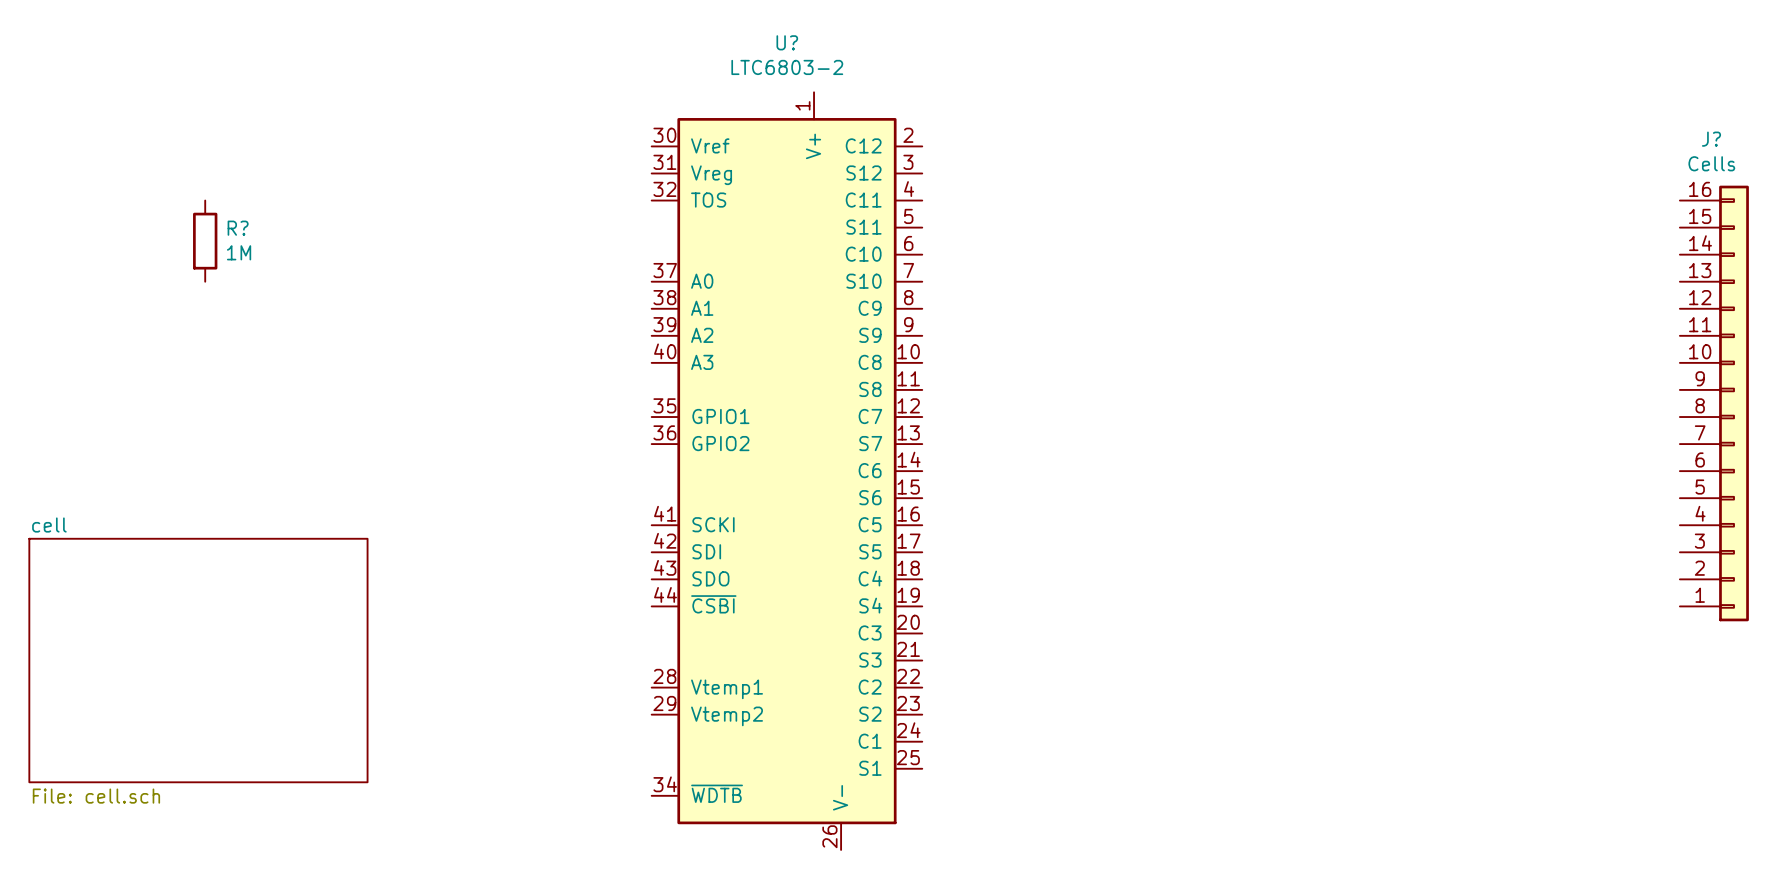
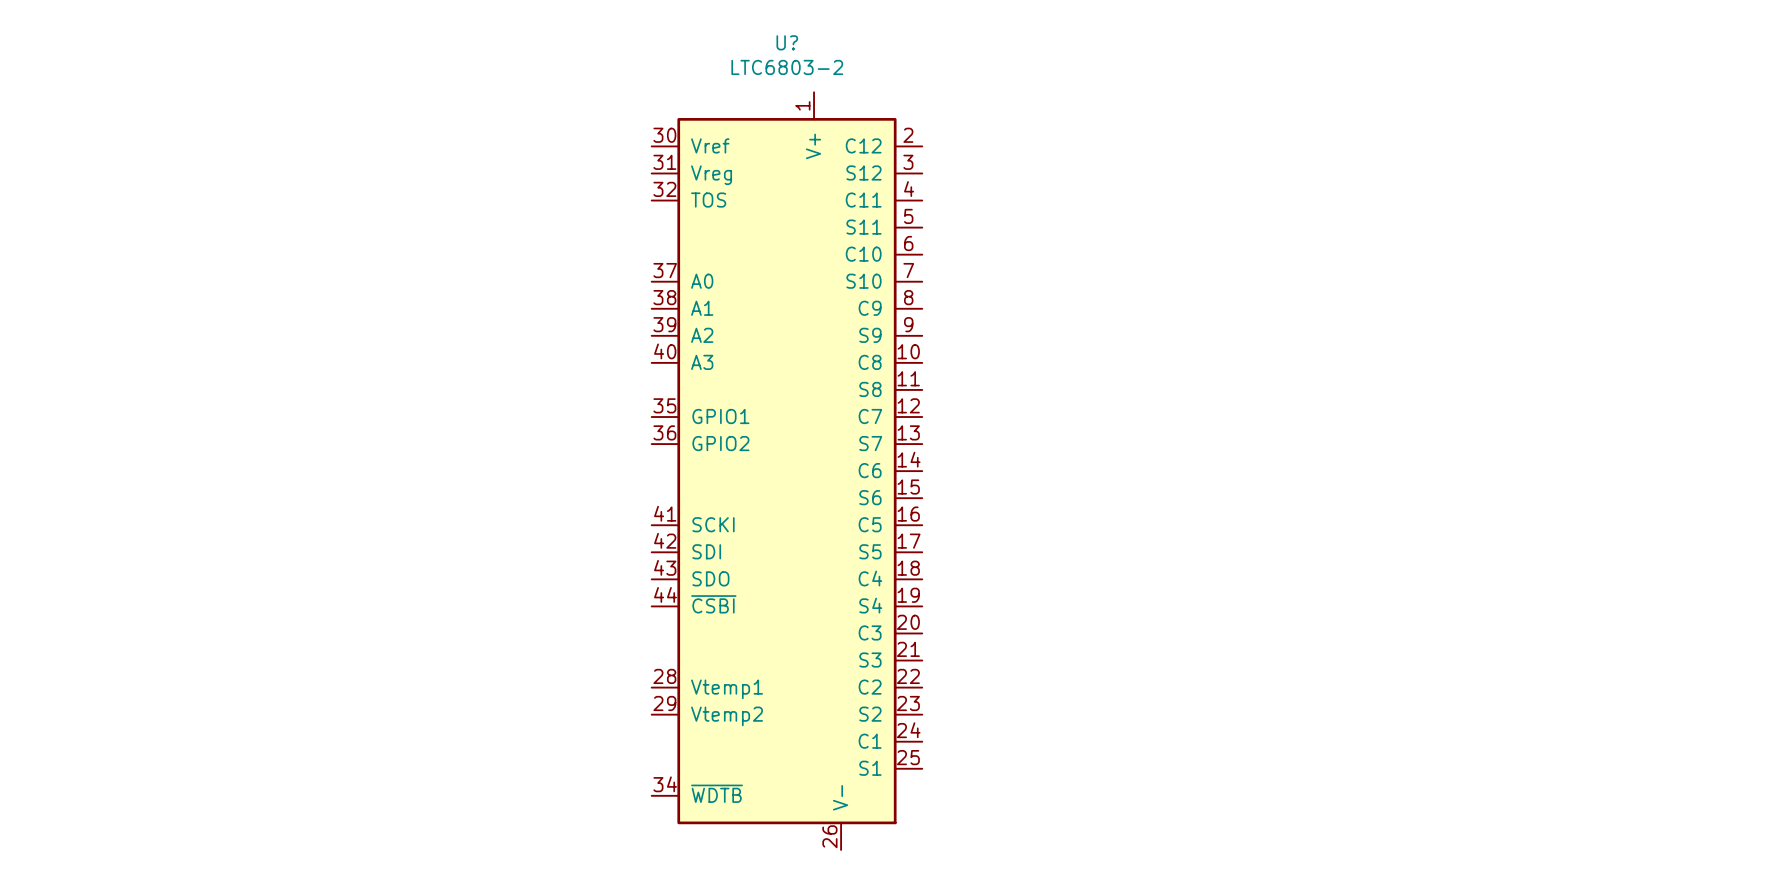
R?: 1M (205, 241) -> none
J?: Cells (1714, 403) -> none
sheet cell: File: cell.sch (198, 660) -> none

